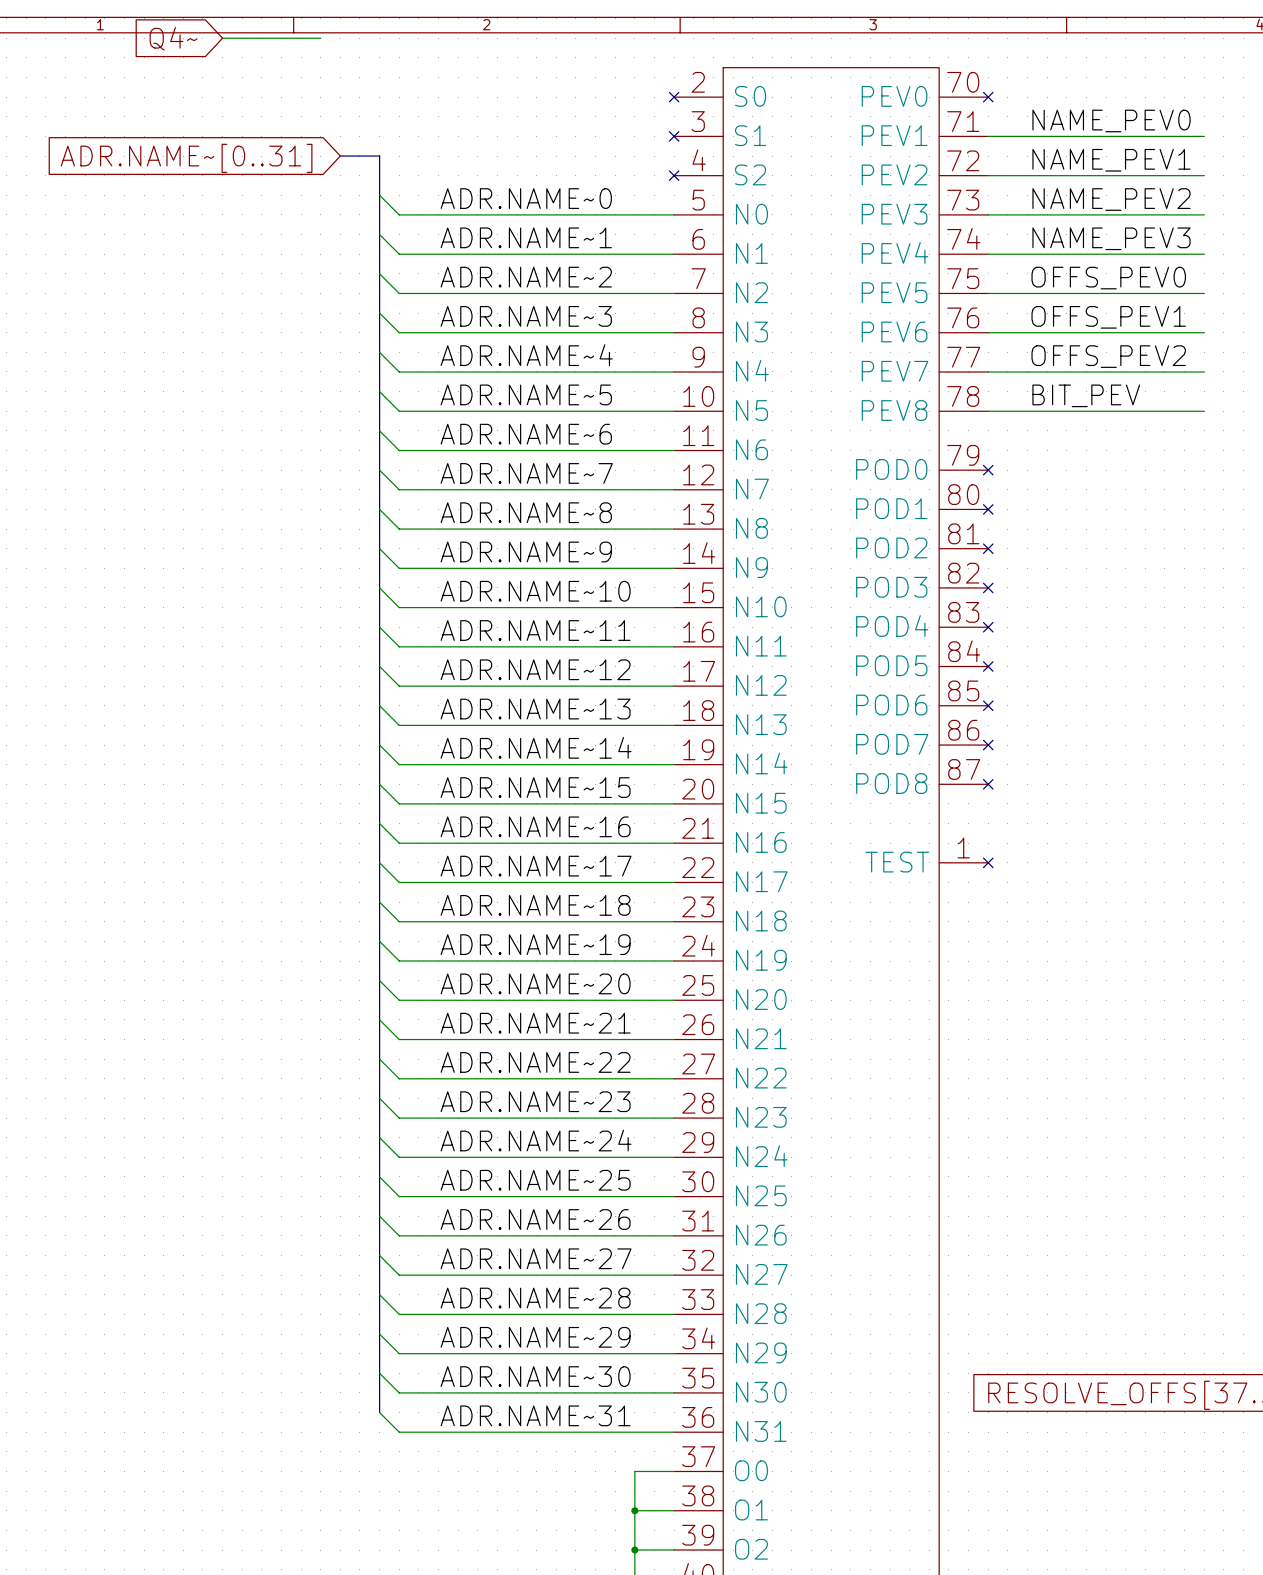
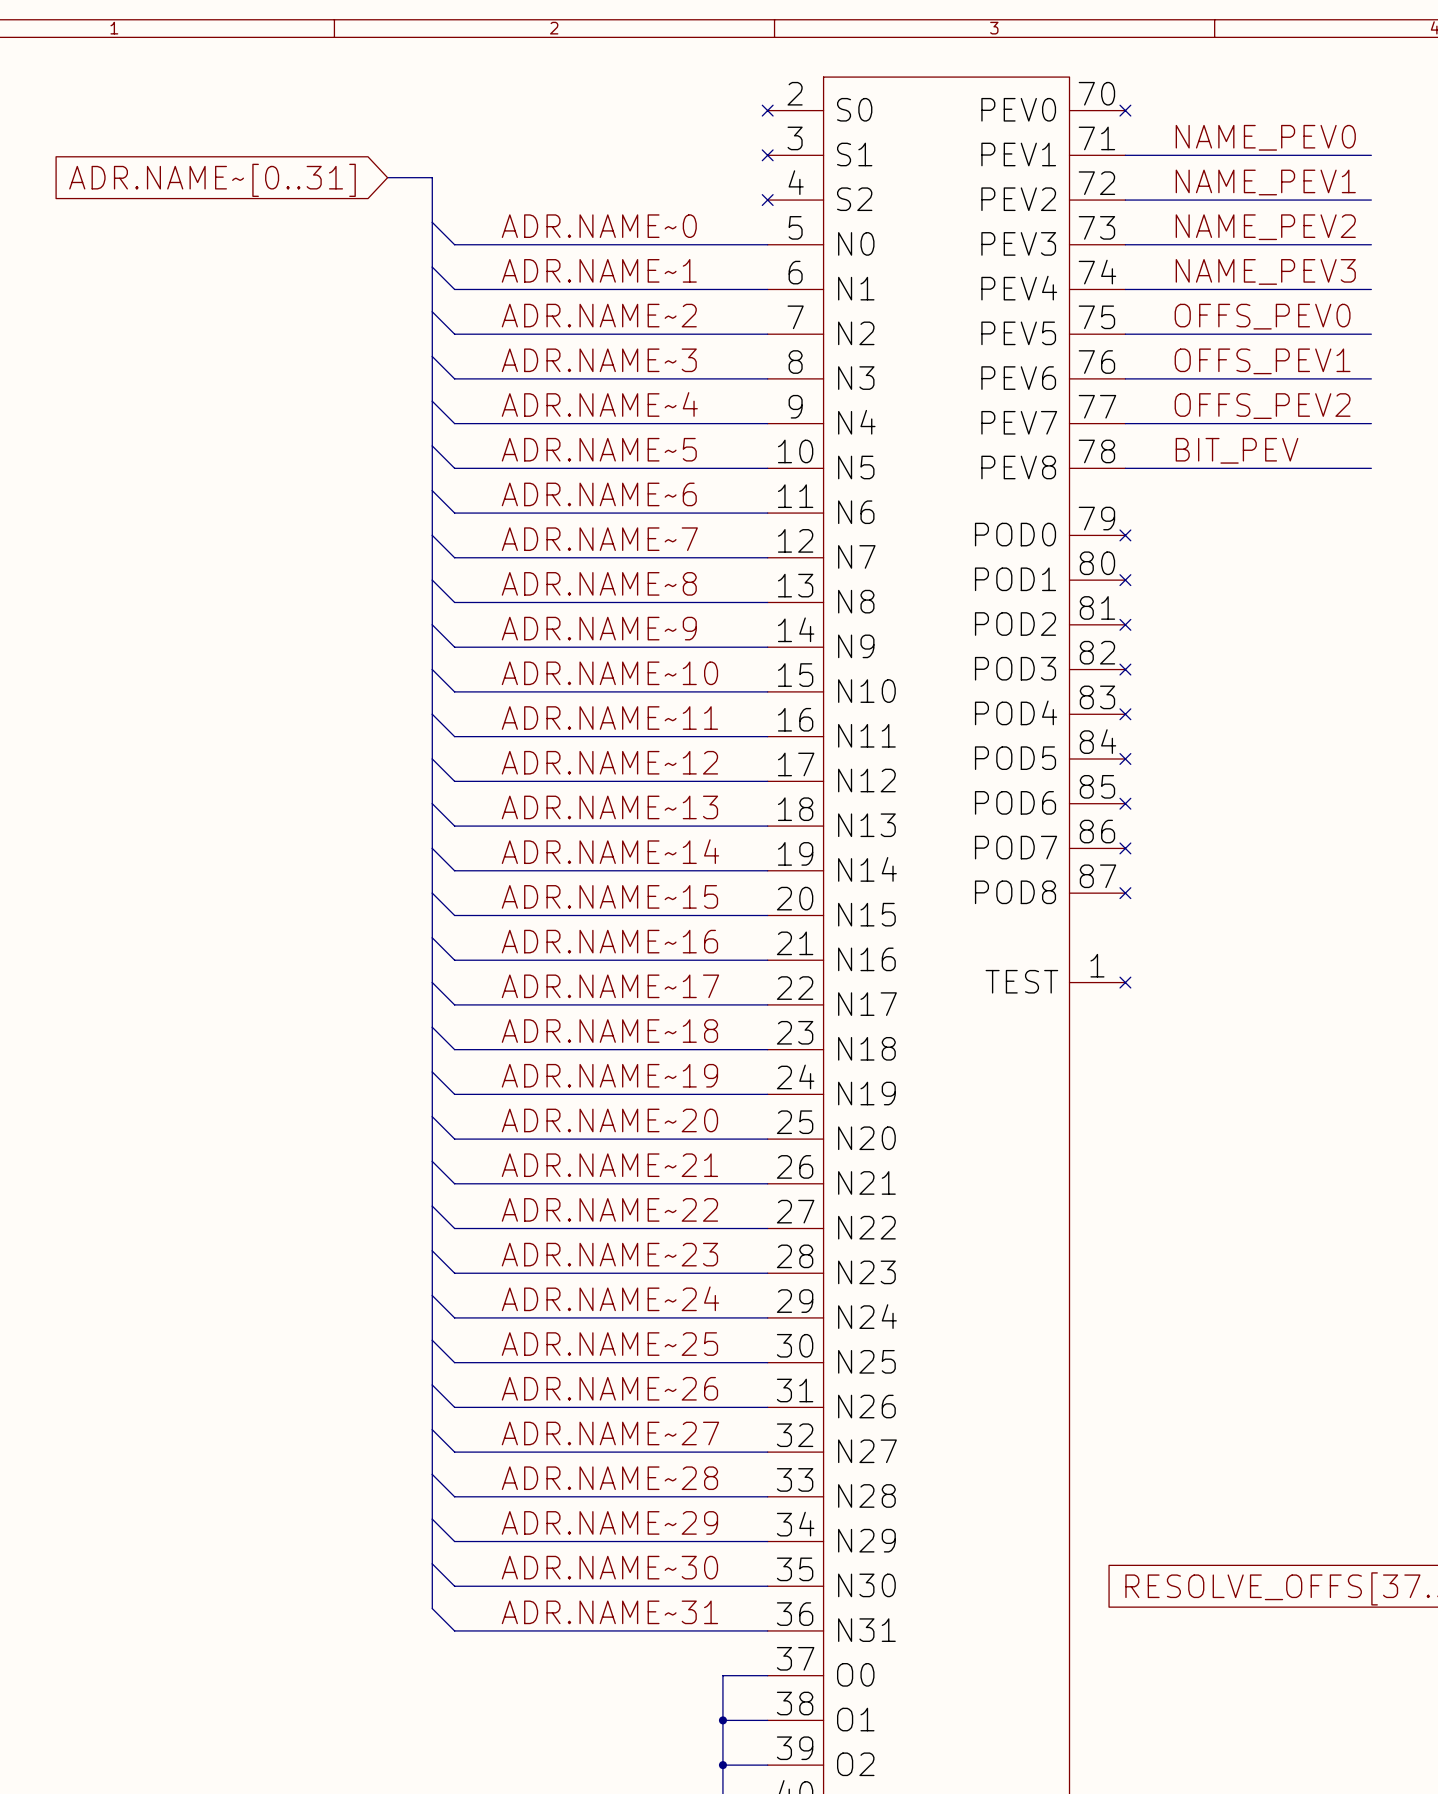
global label: Q4~ (173, 38) -> none
wire: (222, 38) (320, 38) -> none

